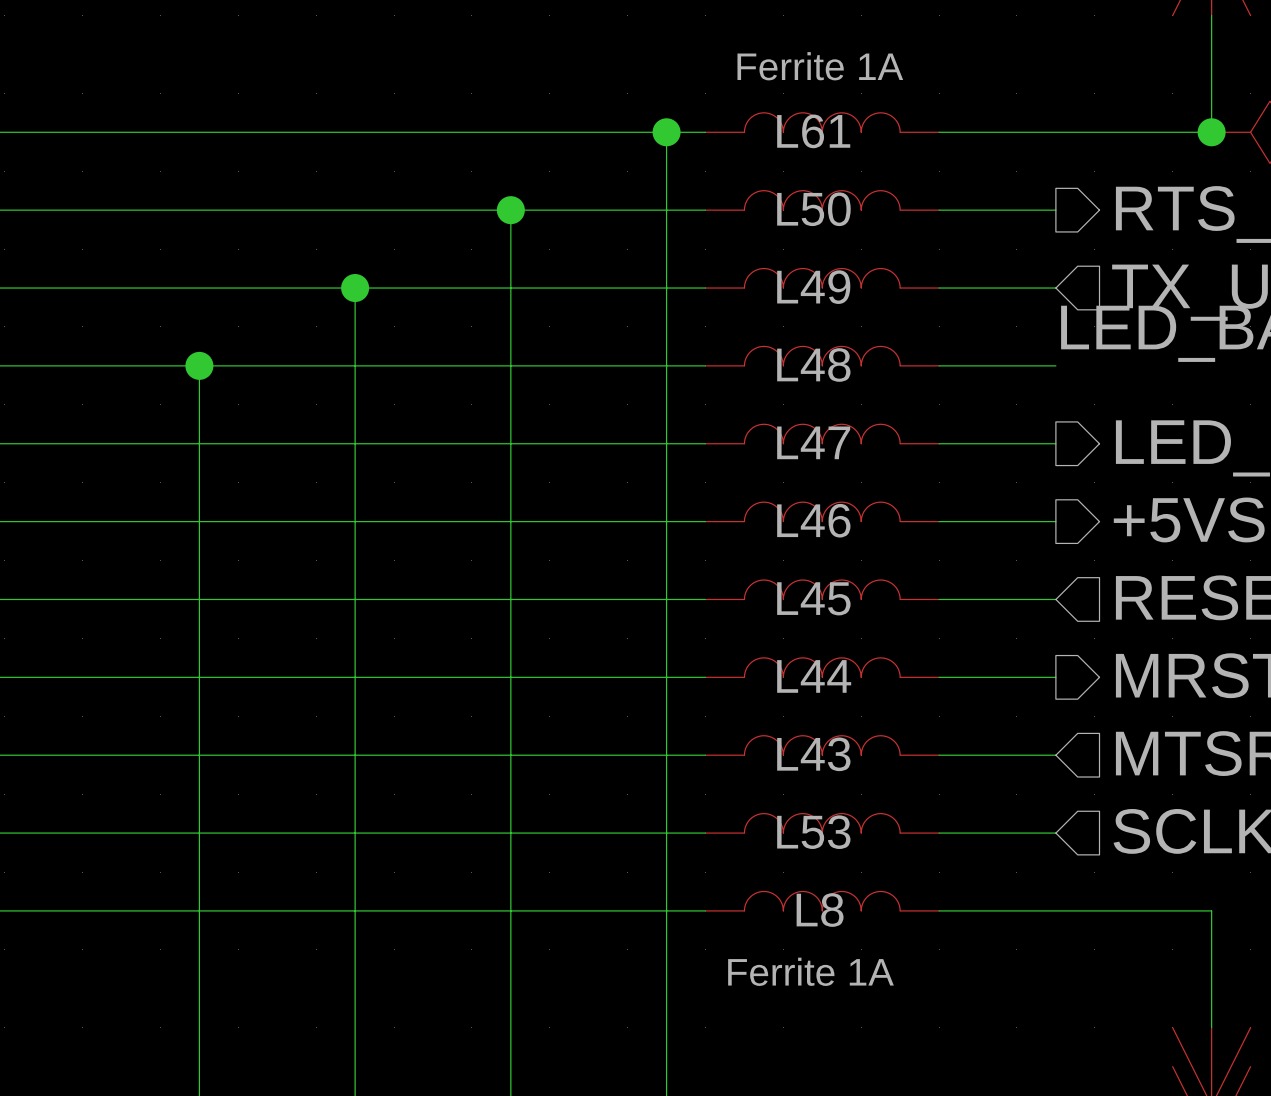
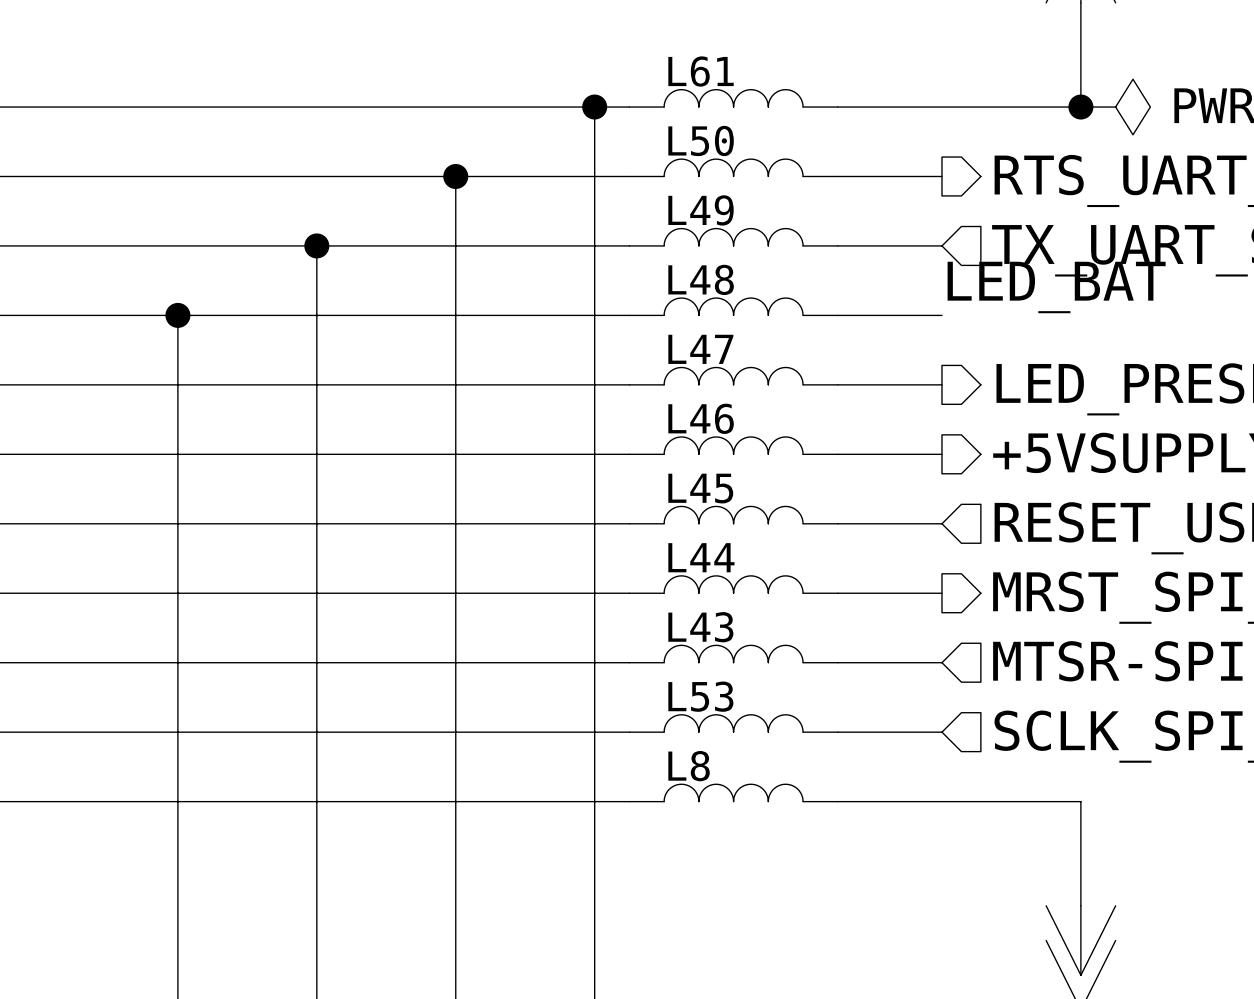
L61 value: Ferrite 1A (820, 66) -> none
L61 name position: L61 (813, 131) -> L61 (701, 71)
L50 name position: L50 (813, 209) -> L50 (701, 140)
L49 name position: L49 (813, 287) -> L49 (701, 210)
L48 name position: L48 (813, 364) -> L48 (701, 279)
L47 name position: L47 (813, 442) -> L47 (700, 349)
L46 name position: L46 (813, 520) -> L46 (701, 418)
L45 name position: L45 (813, 598) -> L45 (700, 488)
L44 name position: L44 (814, 676) -> L44 (701, 557)
L43 name position: L43 (813, 754) -> L43 (700, 627)
L53 name position: L53 (813, 832) -> L53 (700, 696)
L8 name position: L8 (820, 910) -> L8 (689, 766)
L8 value: Ferrite 1A (810, 971) -> none

